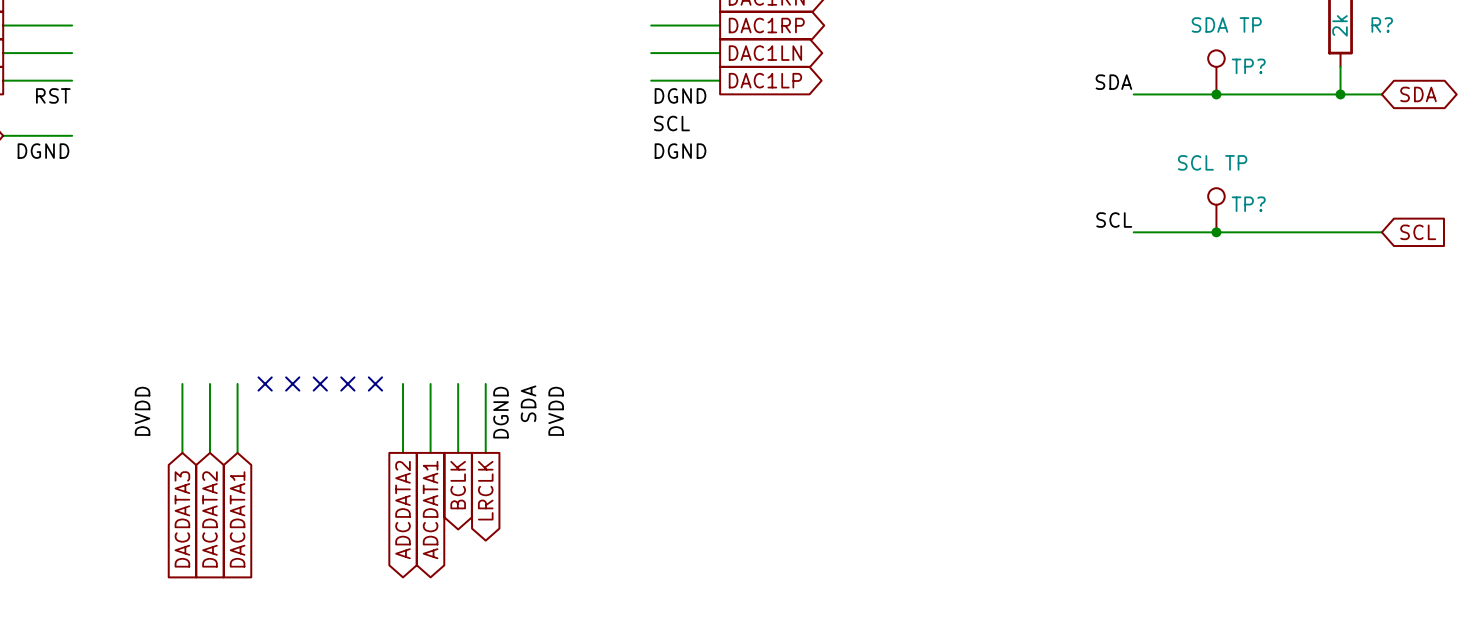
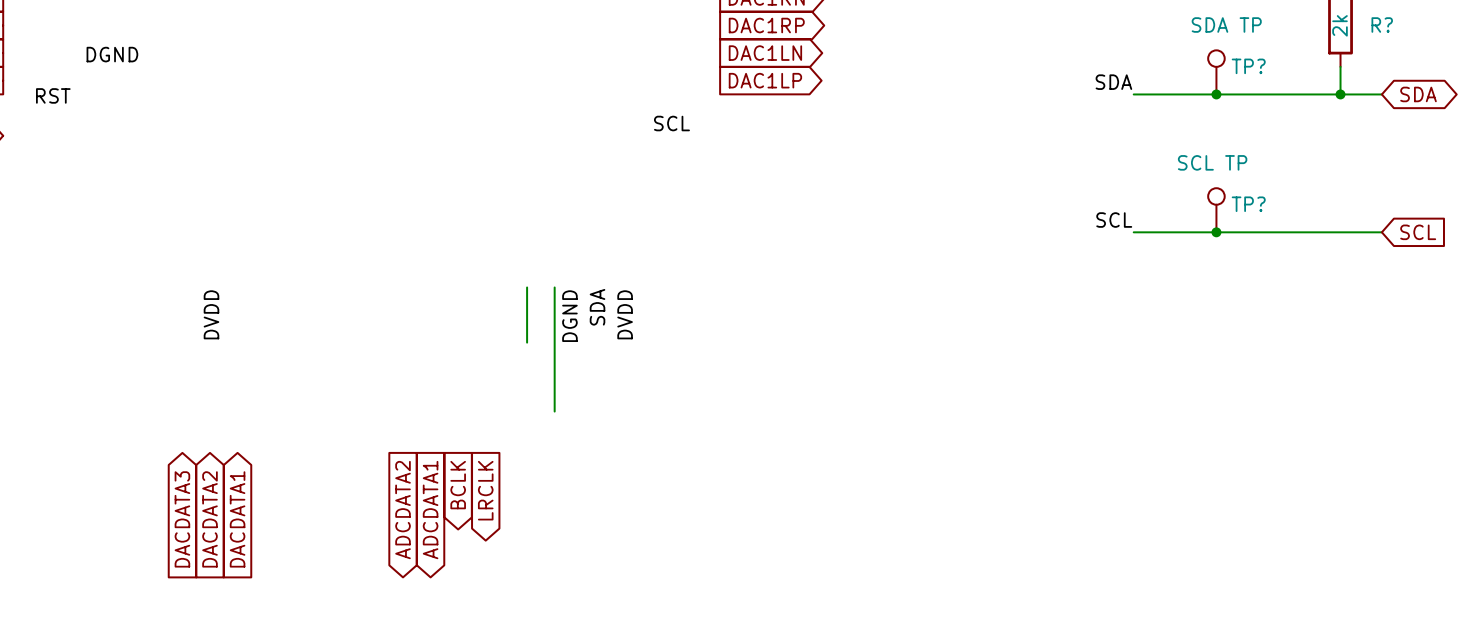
wire: (3, 25) (72, 25) -> none
wire: (651, 25) (720, 25) -> none
wire: (3, 53) (72, 53) -> none
wire: (651, 53) (720, 53) -> none
wire: (3, 80) (72, 80) -> none
wire: (651, 80) (720, 80) -> none
label: DGND (680, 95) -> none
wire: (3, 135) (72, 135) -> none
label position: DGND (43, 151) -> DGND (112, 54)
label: DGND (680, 151) -> none
wire: none -> (527, 287) (527, 342)
wire: none -> (554, 287) (554, 411)
label: none -> DGND (569, 316)
wire: (182, 383) (182, 452) -> none
wire: (209, 383) (209, 452) -> none
wire: (237, 383) (237, 452) -> none
no-connect mark: (265, 383) -> none
no-connect mark: (292, 383) -> none
no-connect mark: (320, 383) -> none
no-connect mark: (347, 383) -> none
no-connect mark: (375, 383) -> none
wire: (403, 383) (403, 452) -> none
wire: (430, 383) (430, 452) -> none
wire: (458, 383) (458, 452) -> none
wire: (485, 383) (485, 452) -> none
label position: SDA (528, 403) -> SDA (597, 307)
label position: DVDD (142, 411) -> DVDD (211, 314)
label position: DVDD (556, 411) -> DVDD (625, 314)
label: DGND (501, 412) -> none

